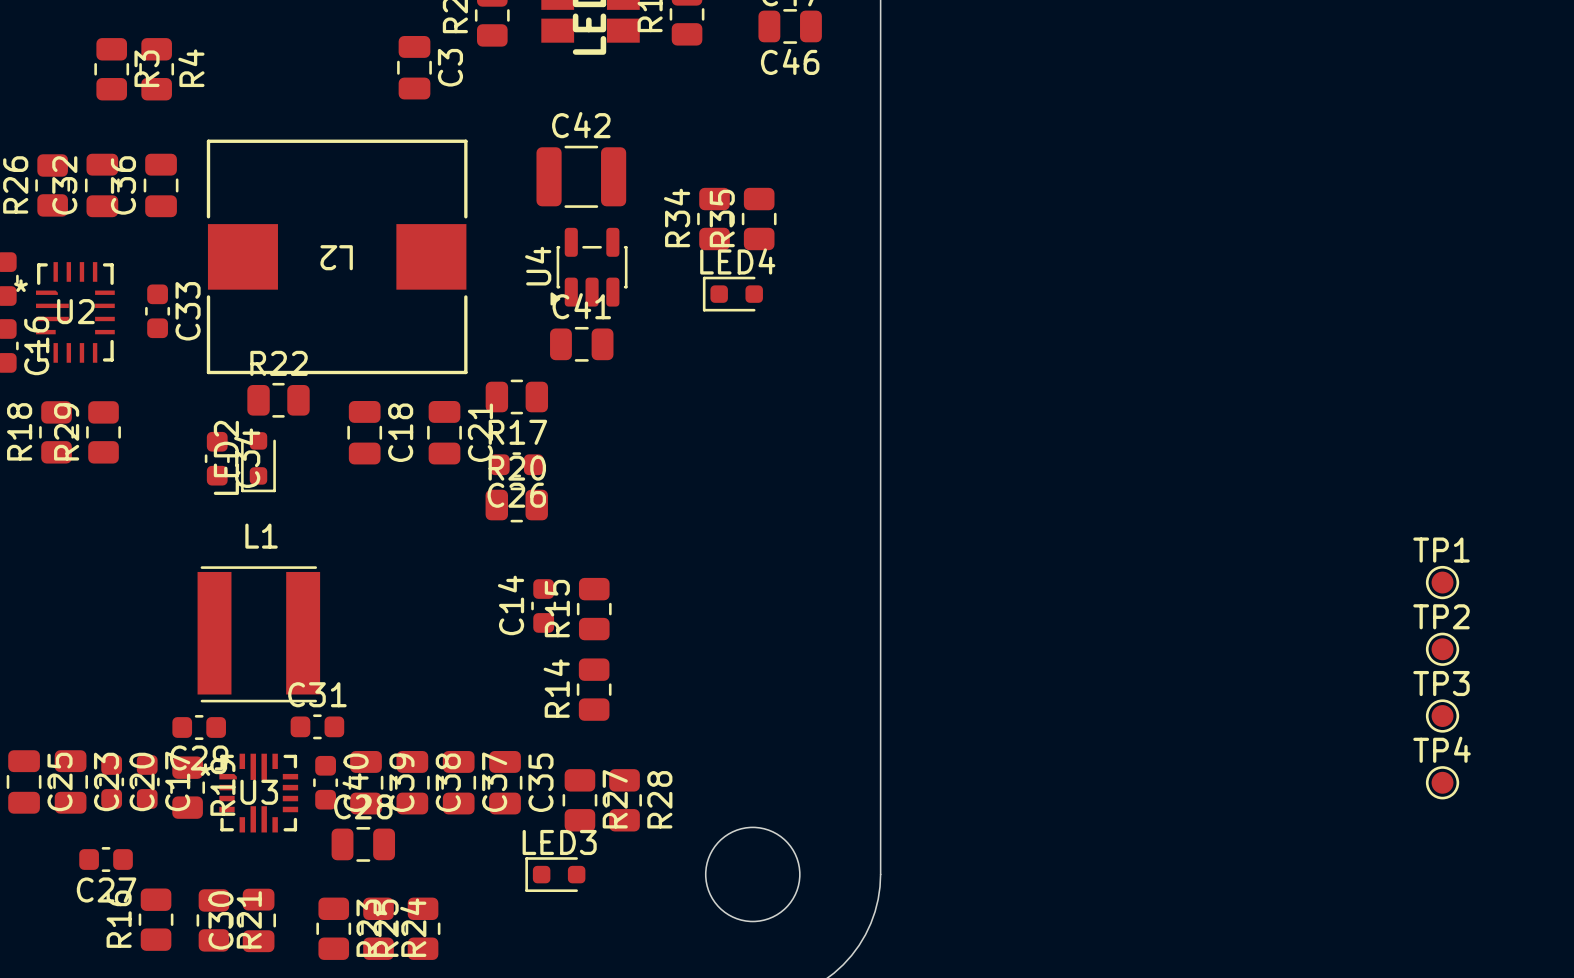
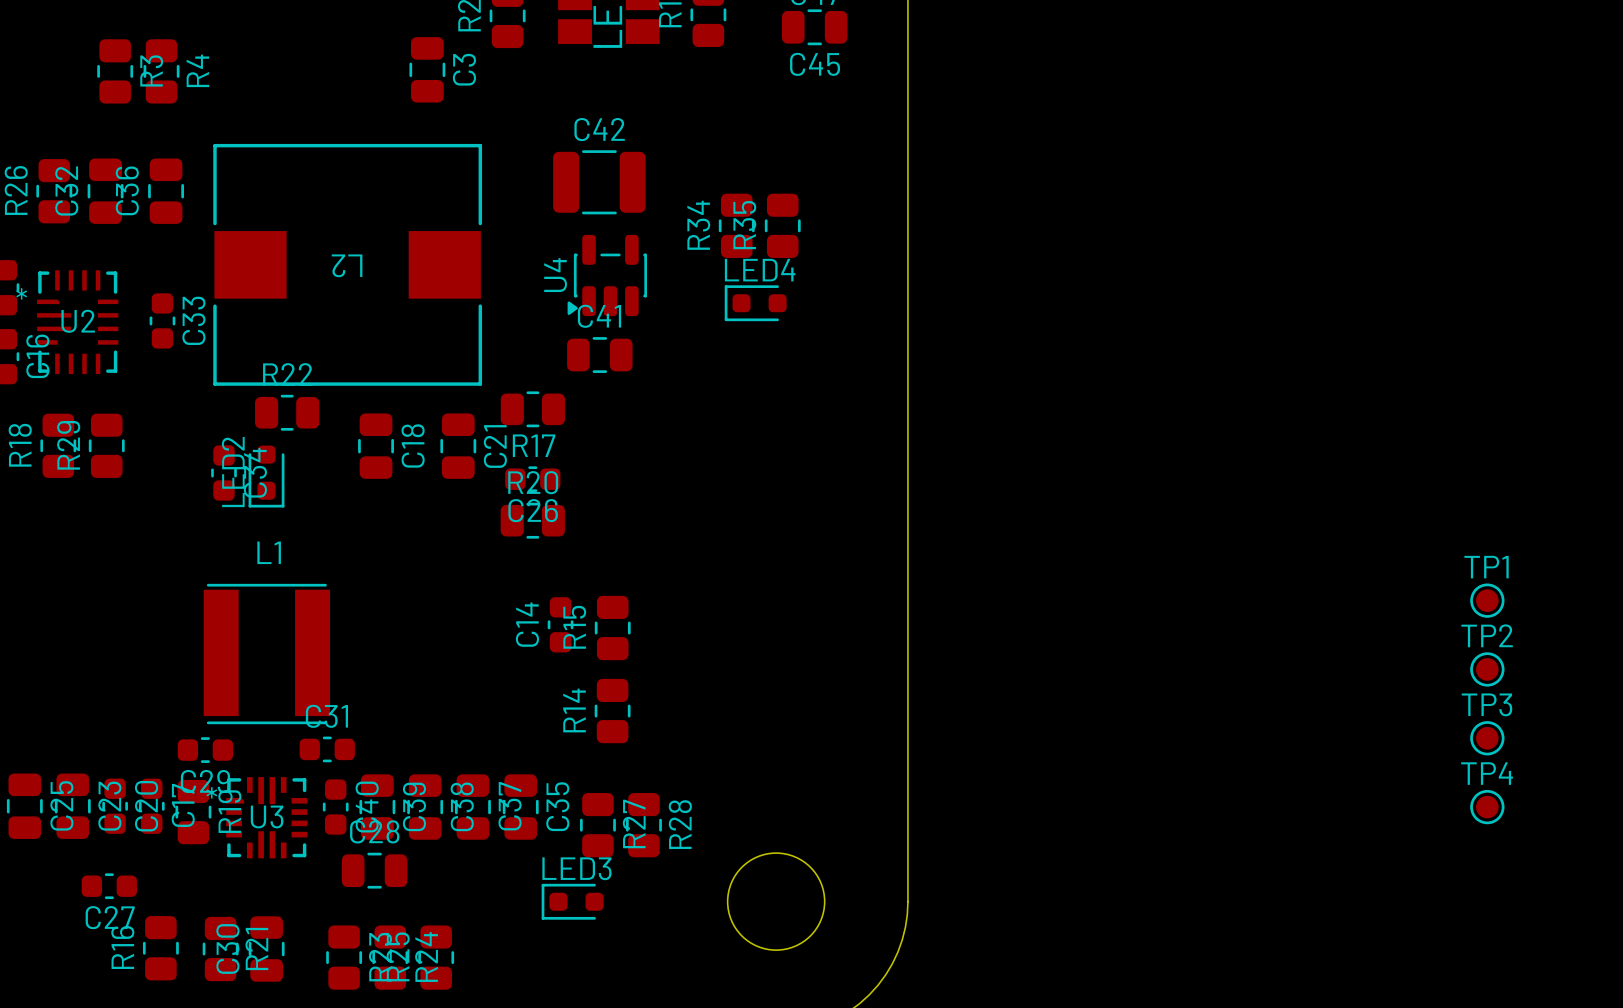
C46 name: C46 (790, 61) -> C45 (815, 64)

